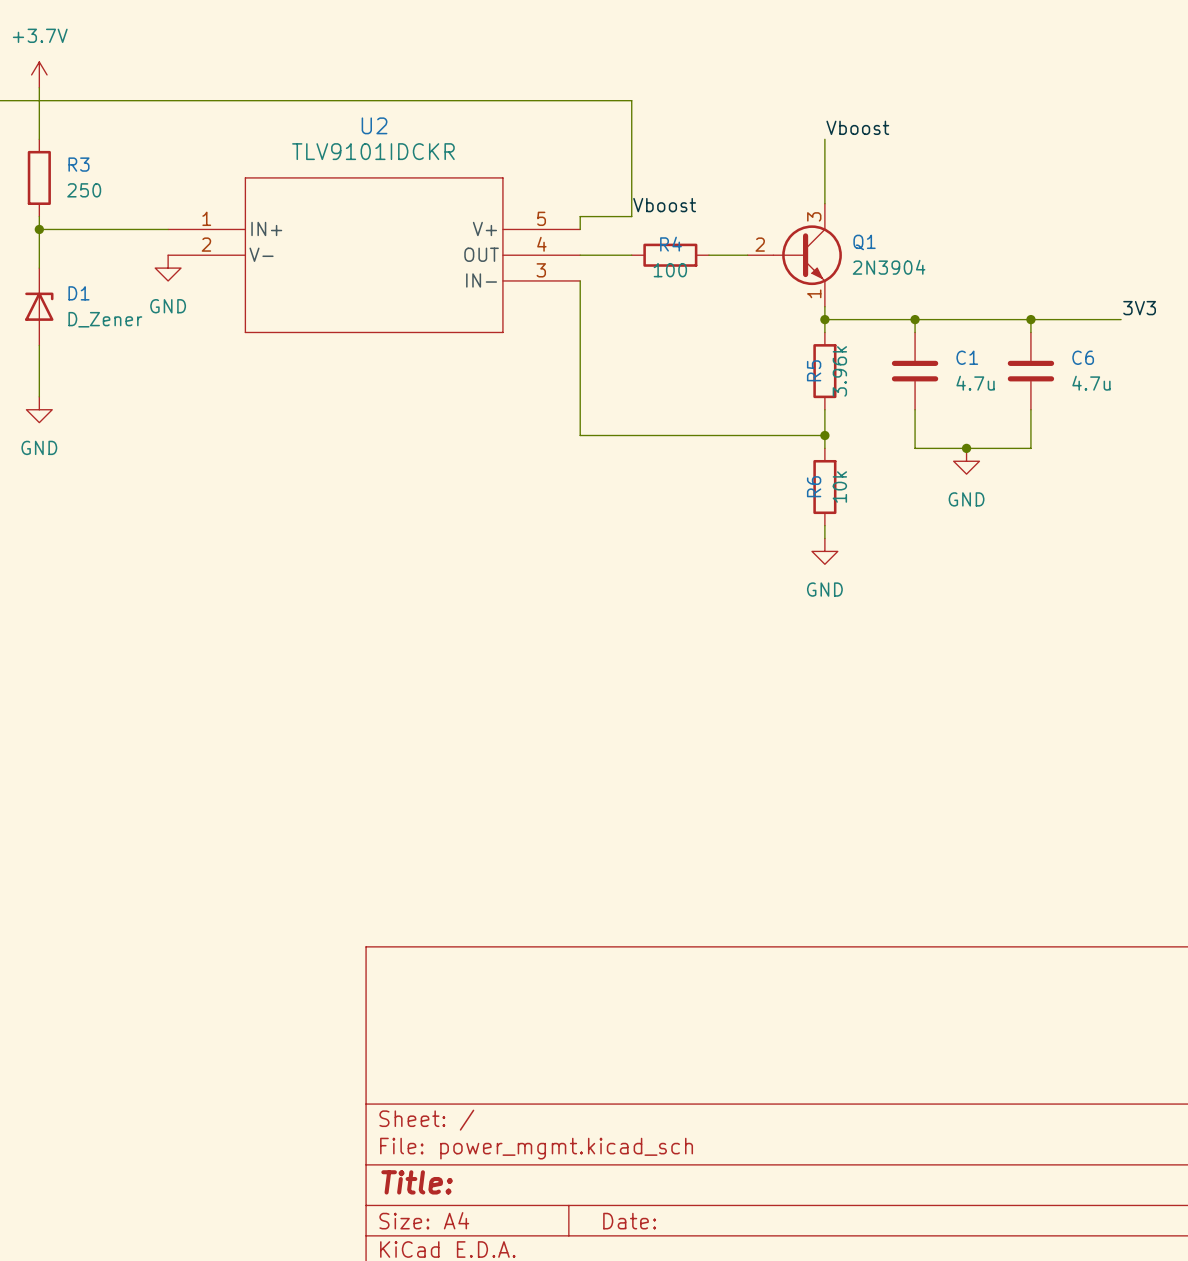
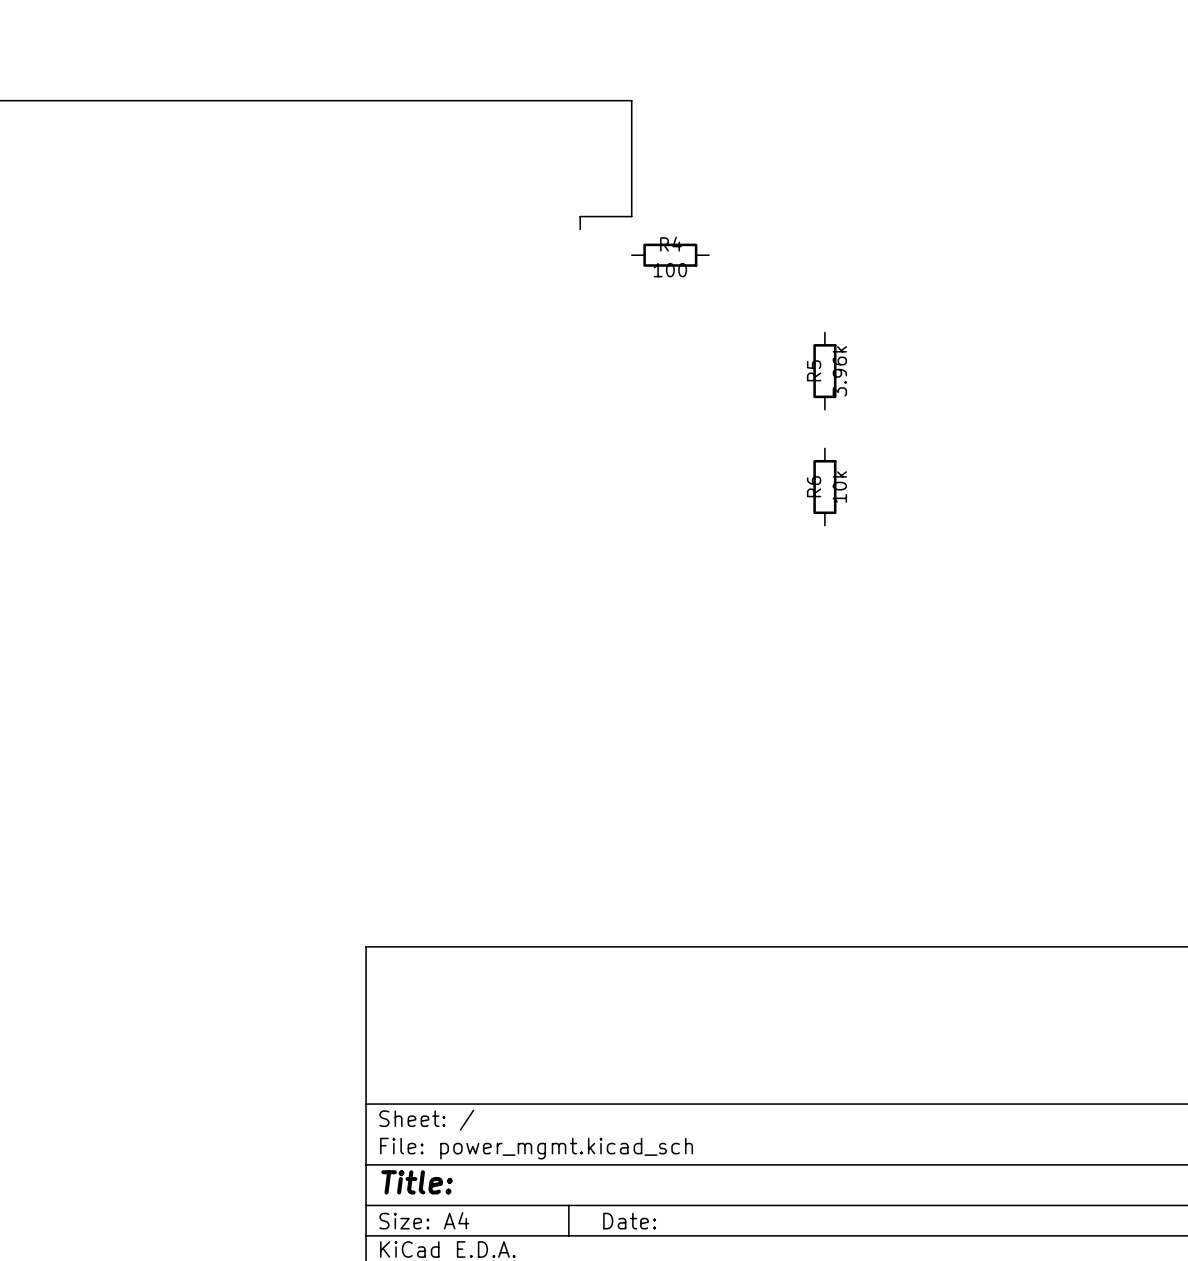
power symbol: +3.7V (39, 74) -> none
wire: (39, 87) (39, 139) -> none
label: Vboost (857, 127) -> none
wire: (824, 139) (824, 203) -> none
R3: 250 (39, 177) -> none
label: Vboost (664, 205) -> none
wire: (39, 216) (39, 268) -> none
wire: (39, 229) (168, 229) -> none
junction: (39, 229) -> none
U2: TLV9101IDCKR (374, 255) -> none
wire: (580, 255) (631, 255) -> none
wire: (709, 255) (747, 255) -> none
Q1: 2N3904 (794, 255) -> none
power symbol: GND (168, 268) -> none
wire: (580, 280) (580, 435) (824, 435) -> none
D1: D_Zener (39, 306) -> none
wire: (824, 306) (824, 332) -> none
label: 3V3 (1139, 308) -> none
wire: (824, 319) (1121, 319) -> none
junction: (824, 319) -> none
wire: (915, 319) (915, 332) -> none
junction: (915, 319) -> none
wire: (1030, 319) (1030, 332) -> none
junction: (1030, 319) -> none
wire: (39, 345) (39, 396) -> none
C1: 4.7u (915, 371) -> none
C6: 4.7u (1030, 371) -> none
power symbol: GND (39, 409) -> none
wire: (824, 409) (824, 448) -> none
wire: (915, 409) (915, 448) (1030, 448) (1030, 409) -> none
junction: (824, 435) -> none
junction: (966, 448) -> none
power symbol: GND (966, 461) -> none
wire: (824, 525) (824, 538) -> none
power symbol: GND (824, 551) -> none

